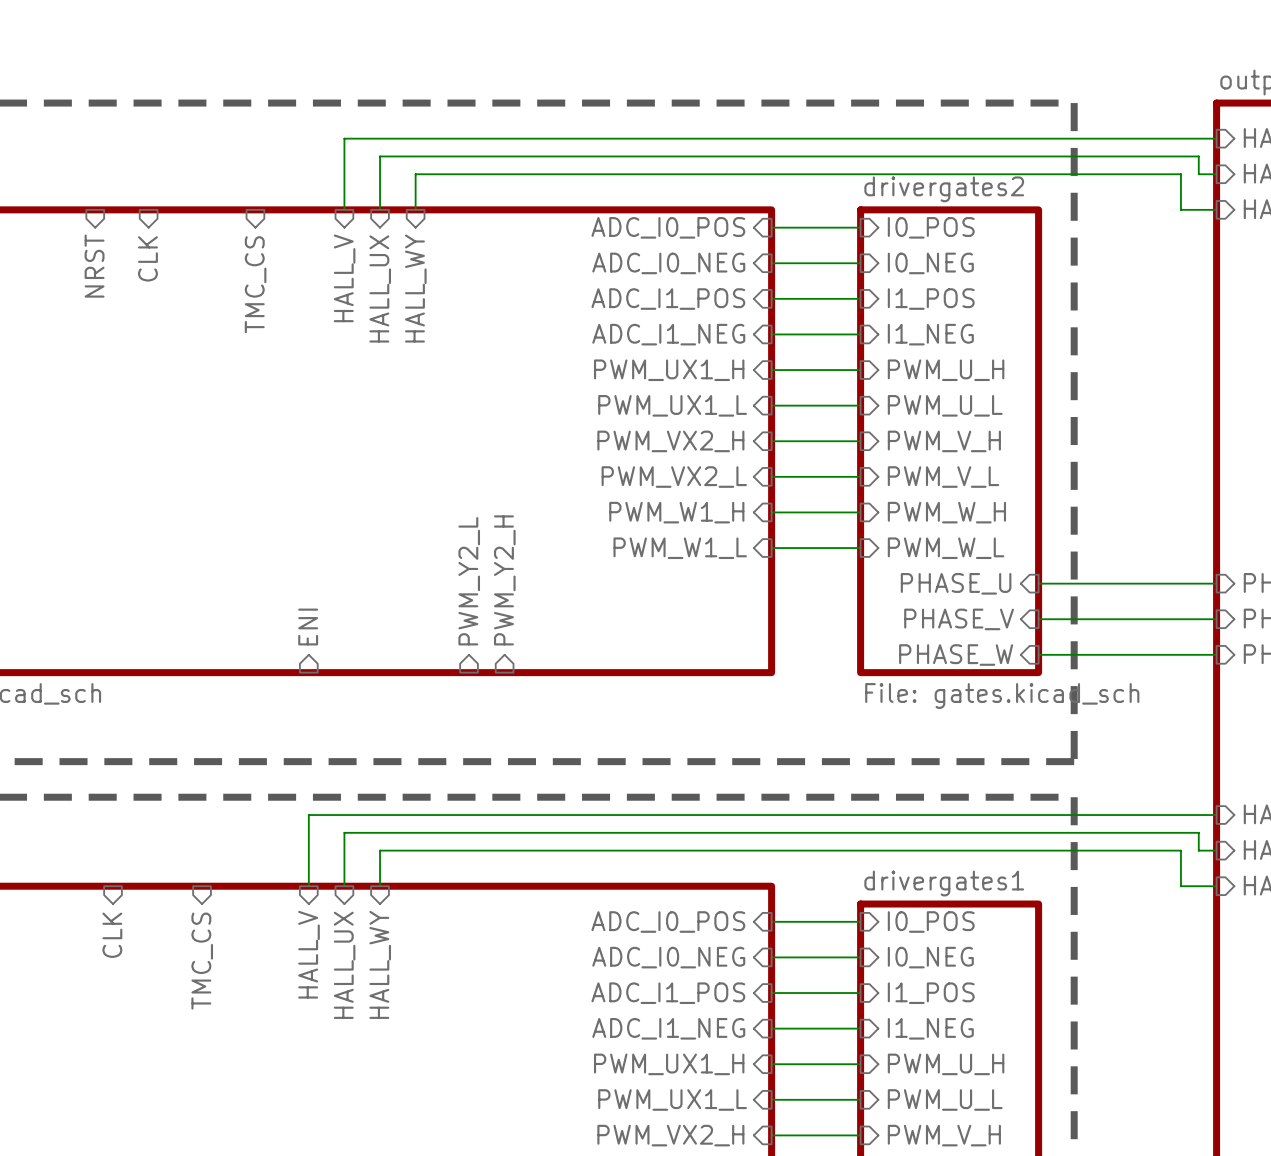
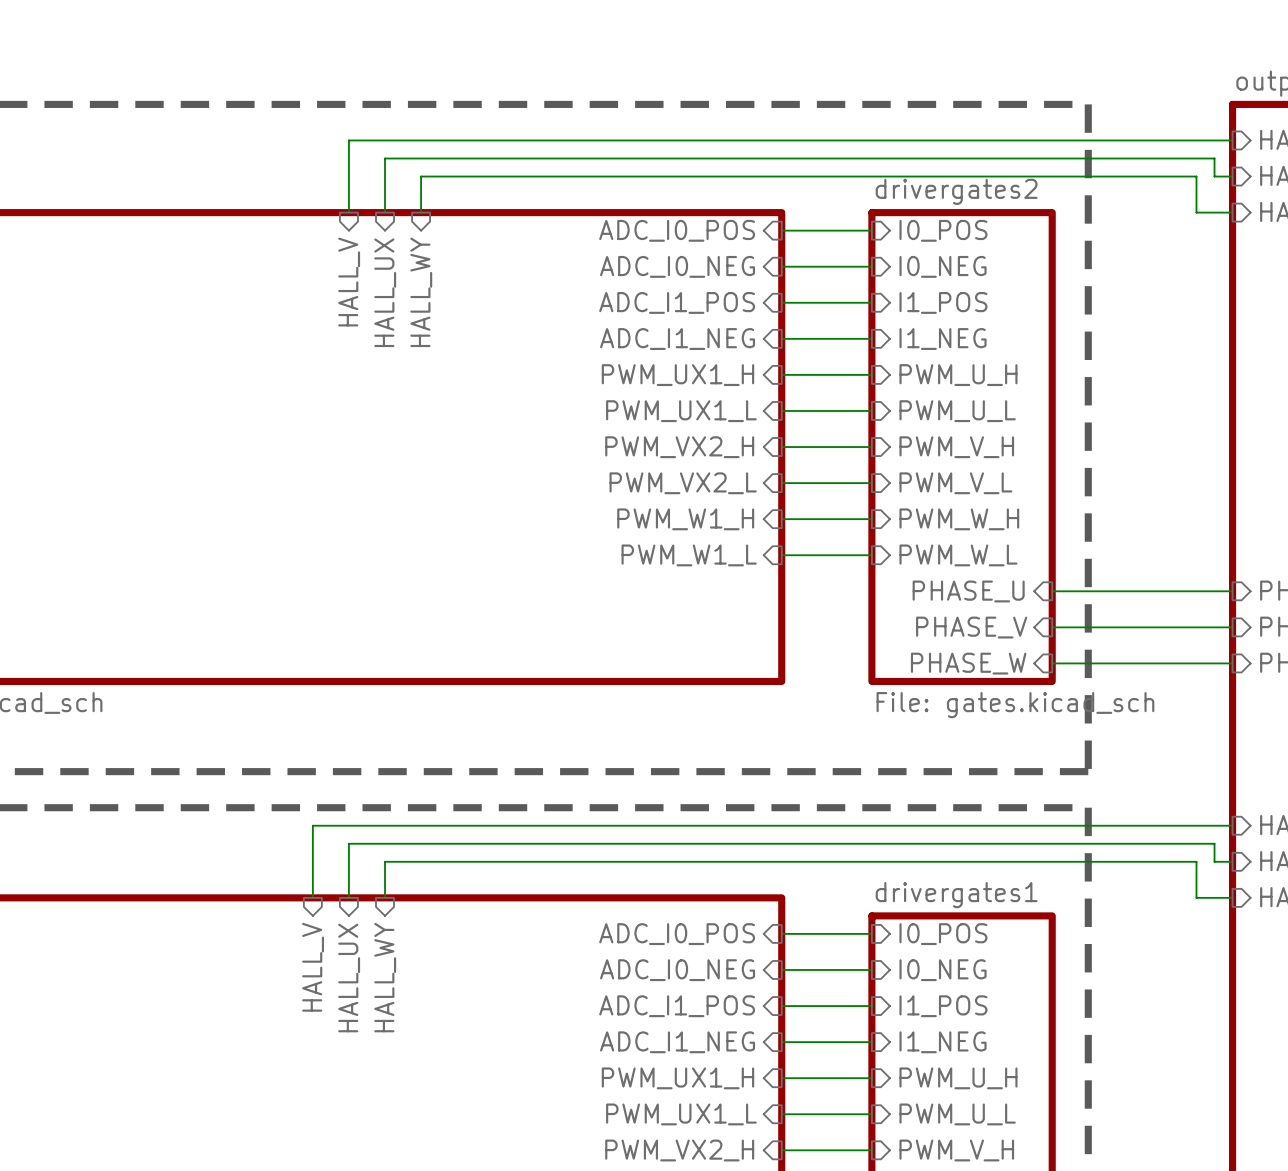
sheet pin: CLK (147, 258) -> none
sheet pin: NRST (94, 266) -> none
sheet pin: TMC_CS (255, 284) -> none
sheet pin: PWM_Y2_H (504, 580) -> none
sheet pin: PWM_Y2_L (469, 581) -> none
sheet pin: ENI (308, 627) -> none
sheet pin: CLK (112, 935) -> none
sheet pin: TMC_CS (202, 961) -> none

